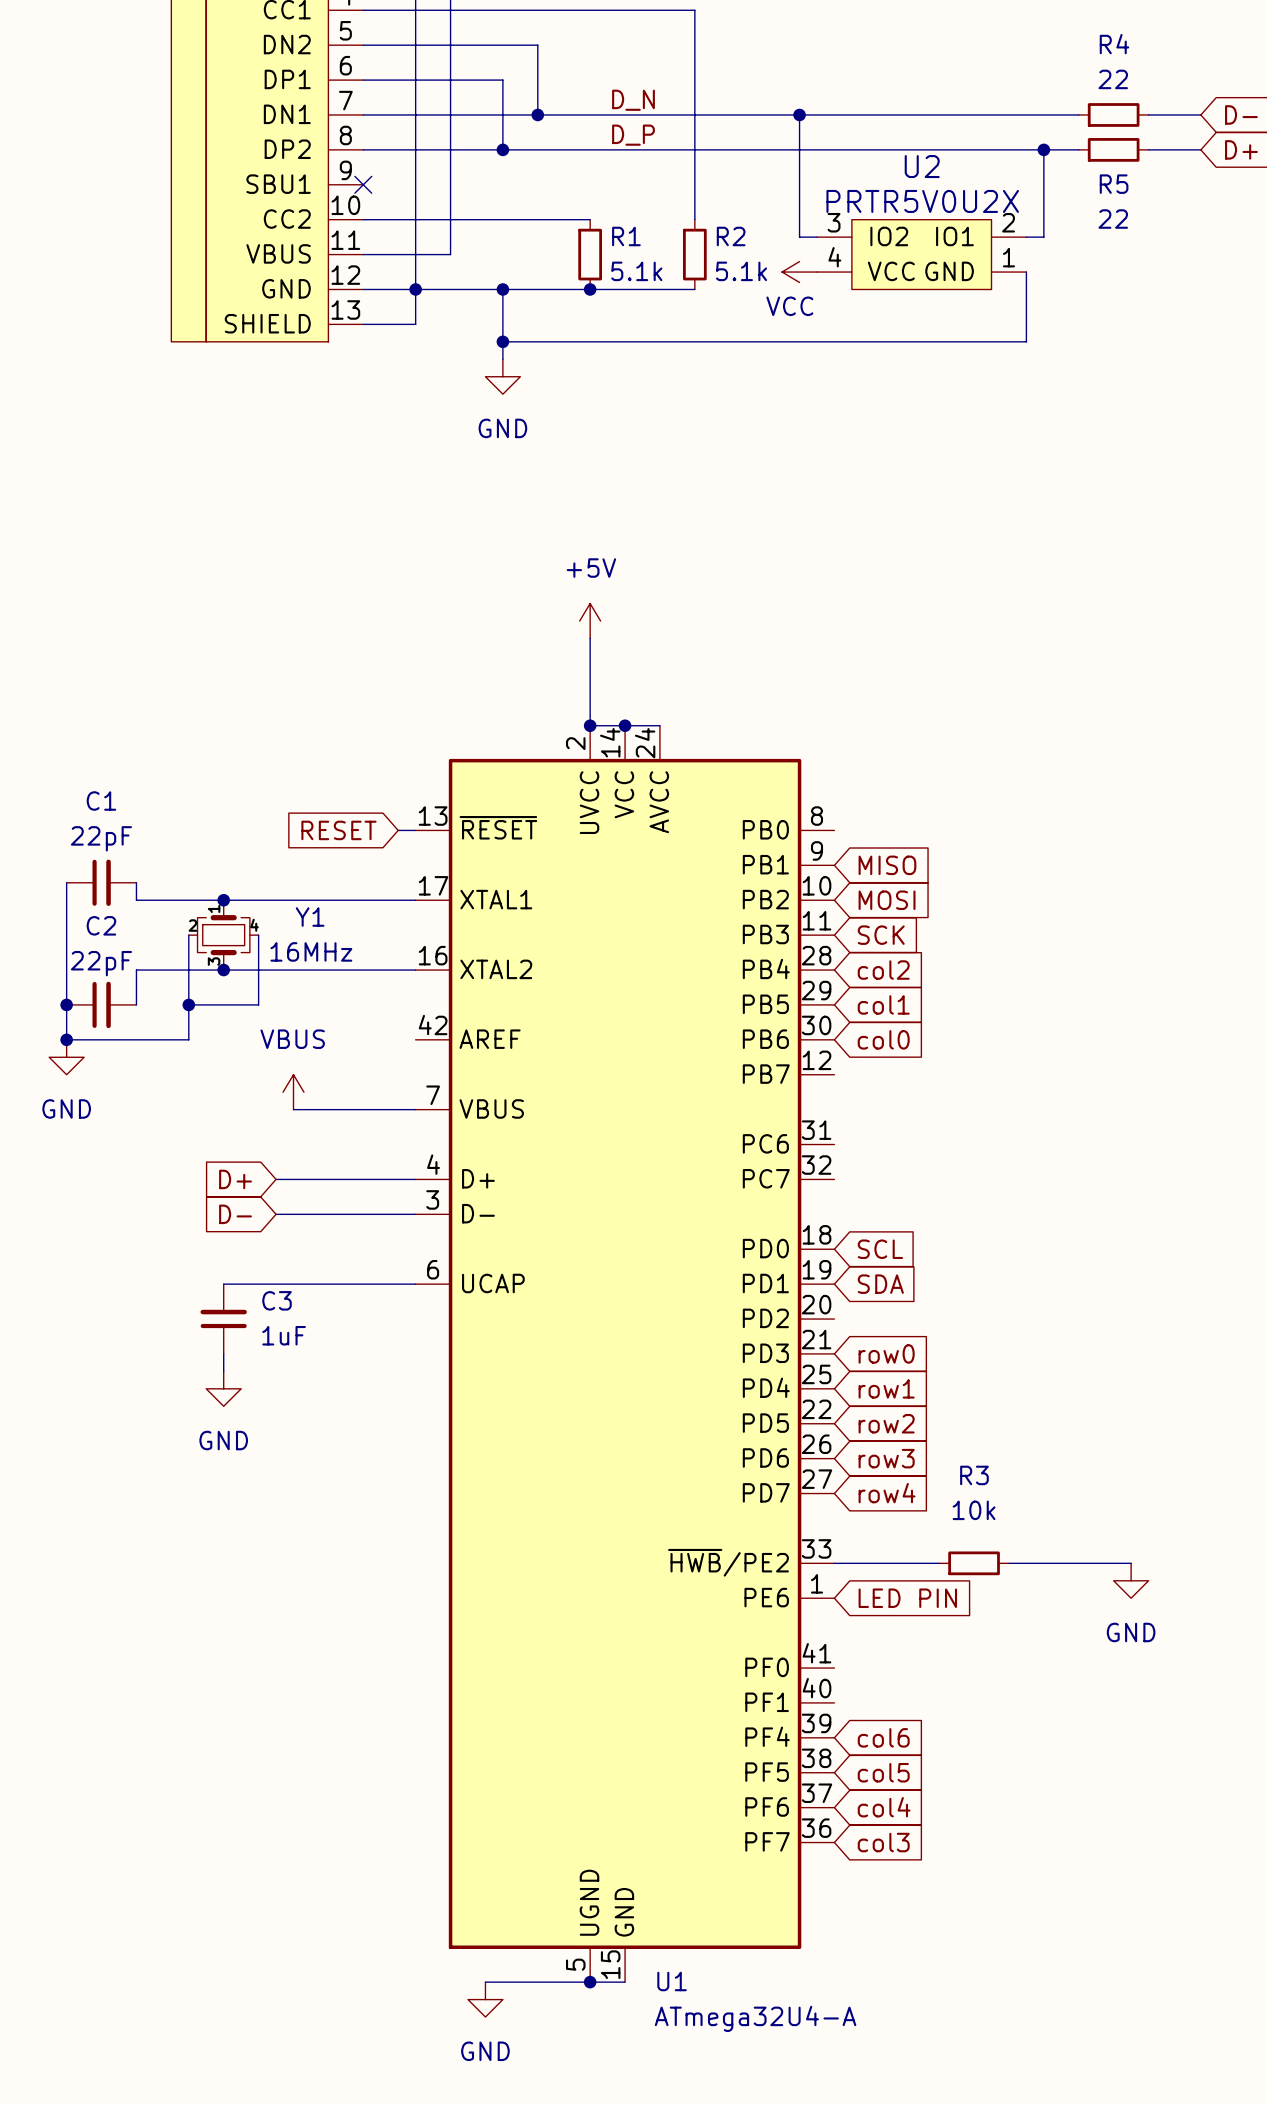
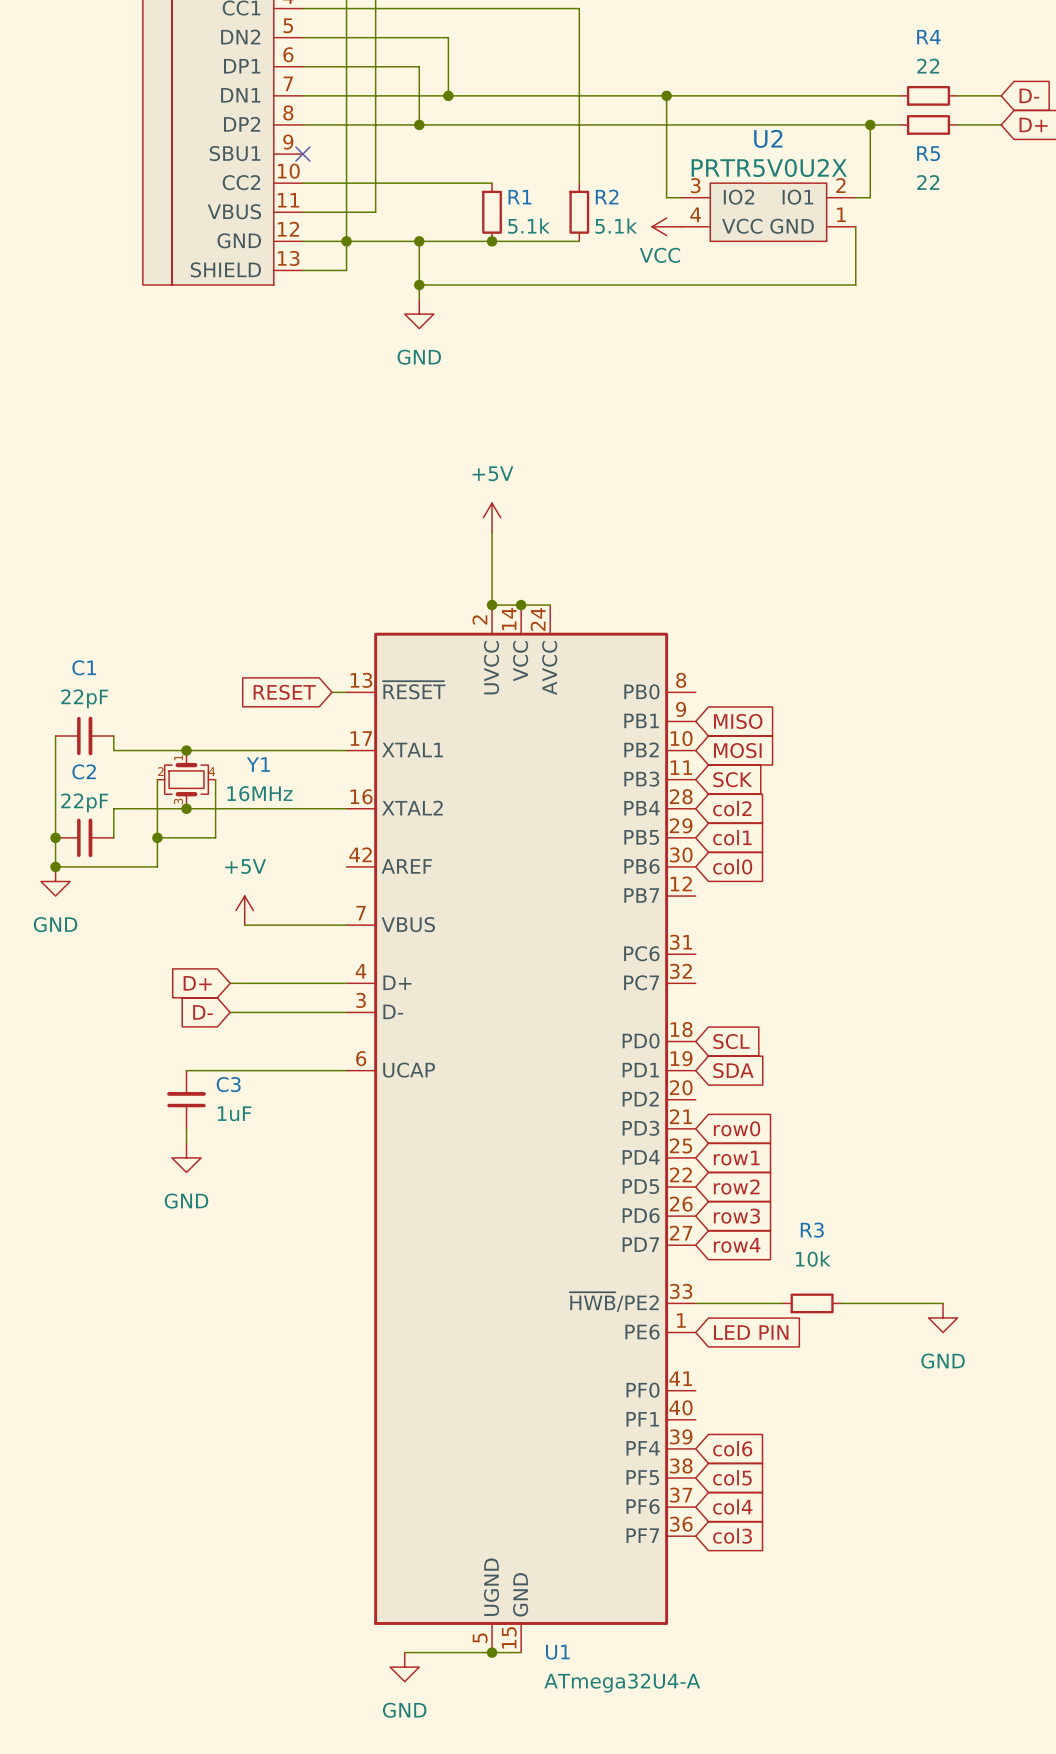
label: D_N (633, 100) -> none
label: D_P (633, 135) -> none
power symbol: VBUS (293, 1092) -> +5V (244, 910)

